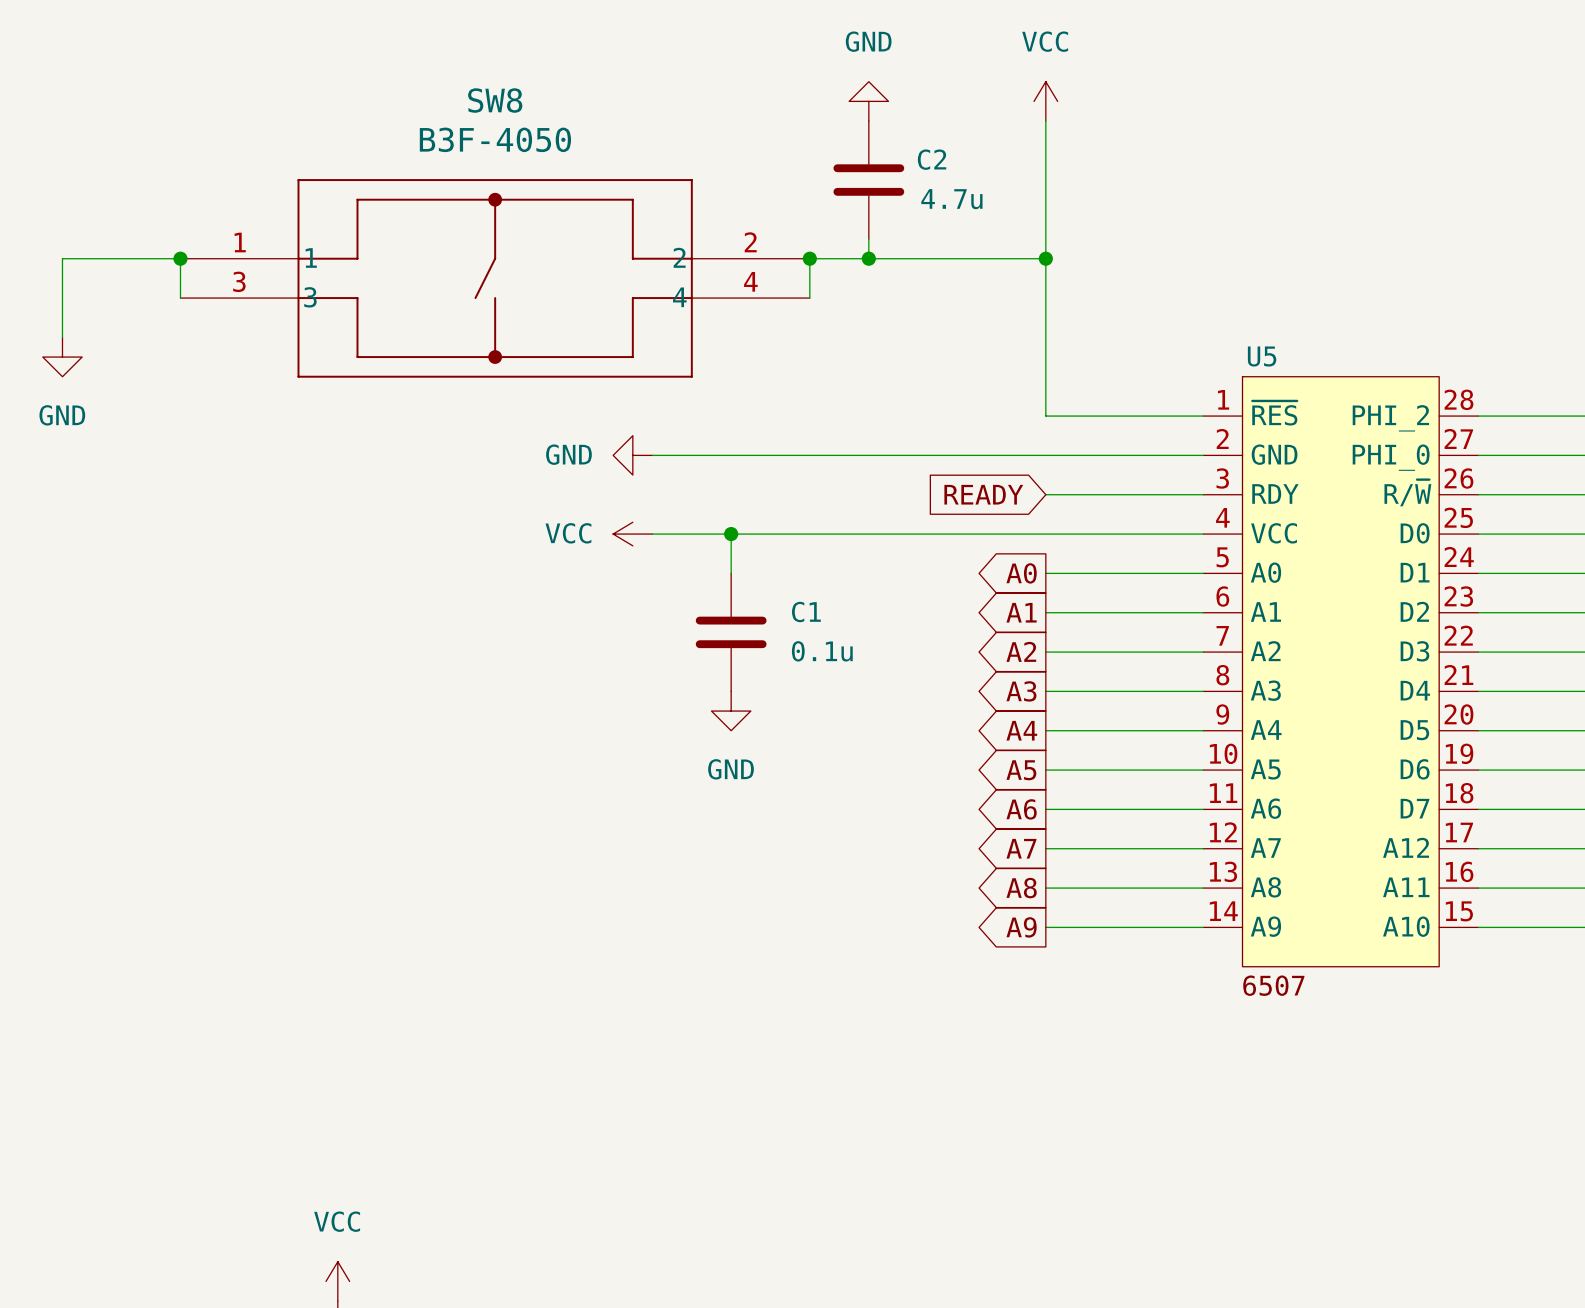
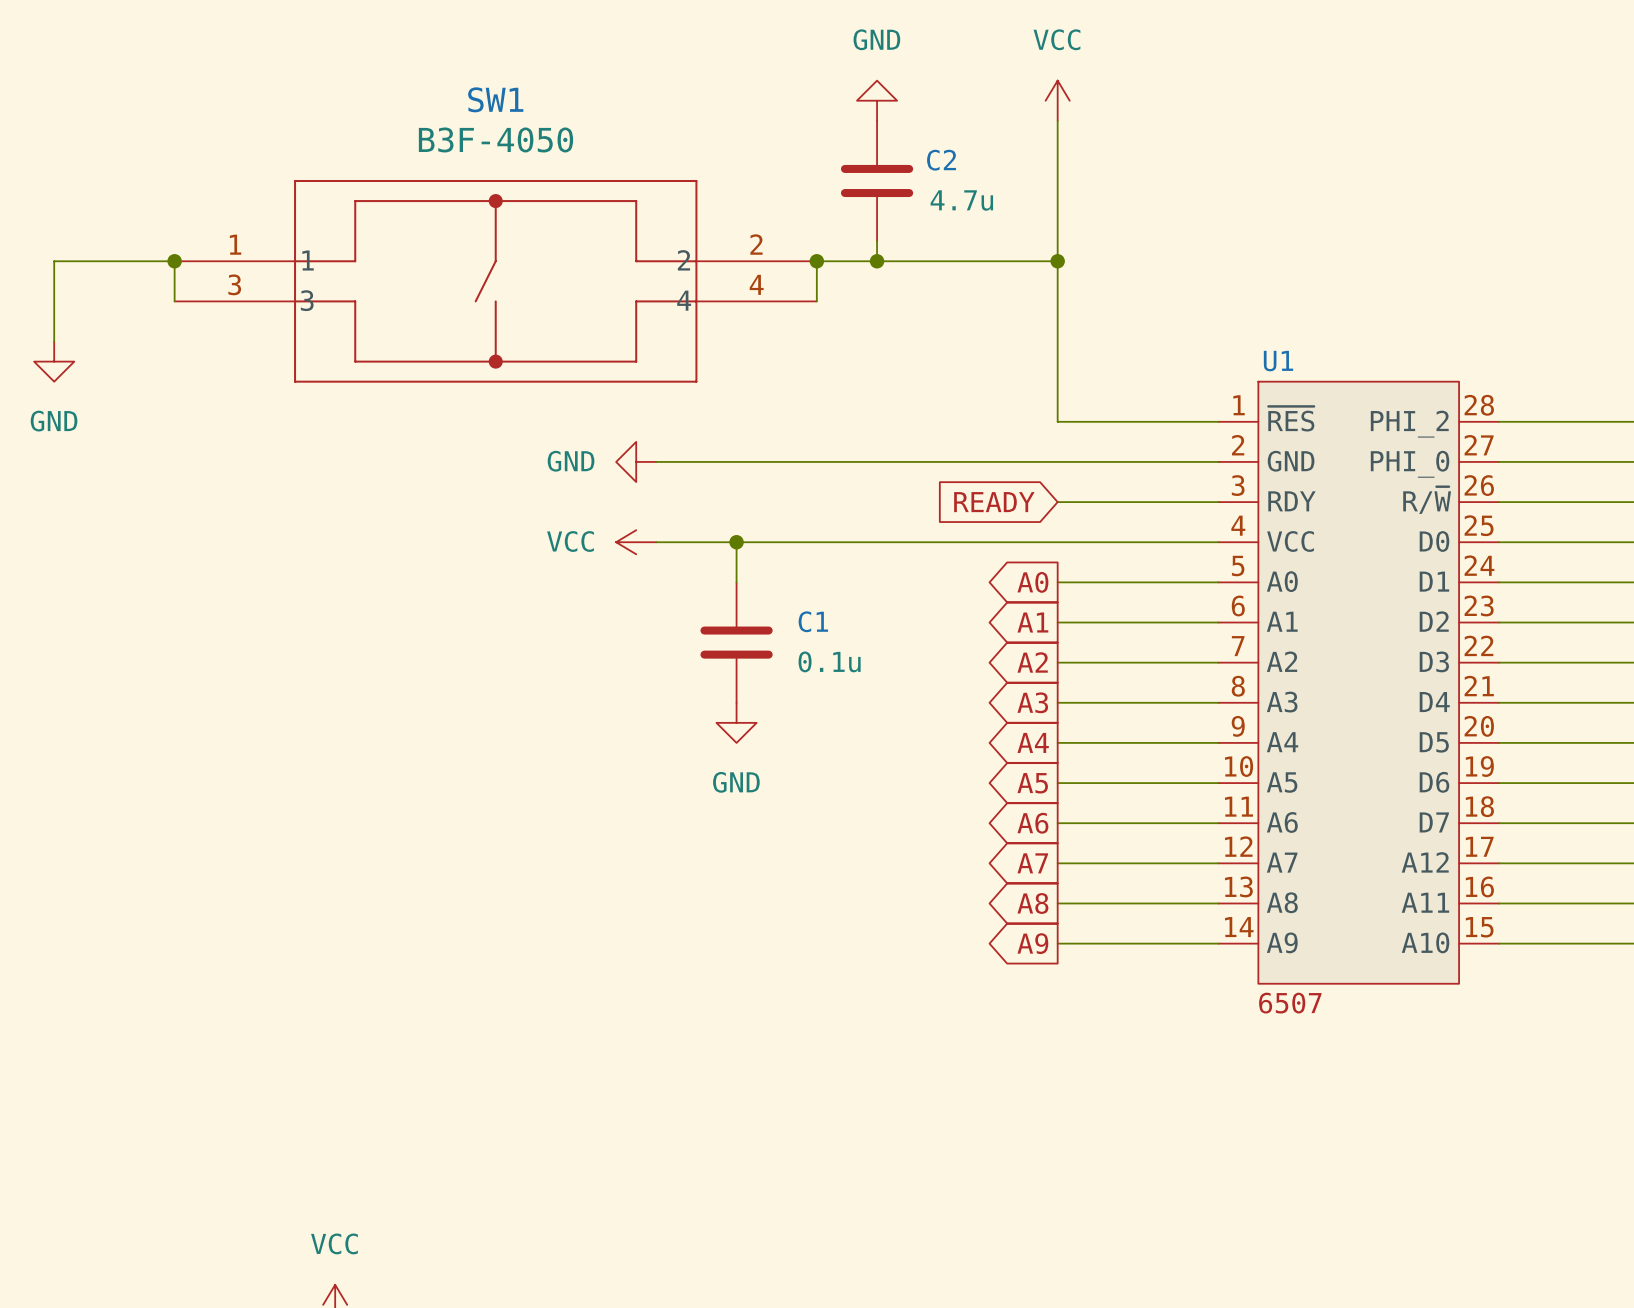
SW8 name: SW8 (495, 100) -> SW1 (495, 99)
U5 name: U5 (1262, 356) -> U1 (1278, 361)

